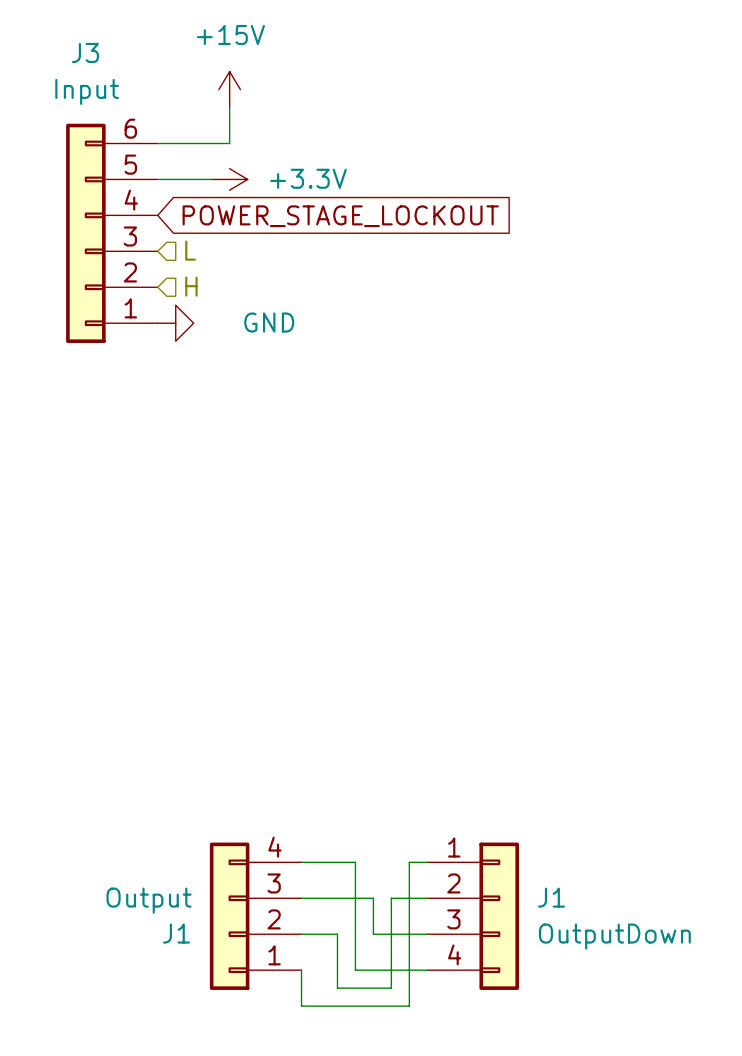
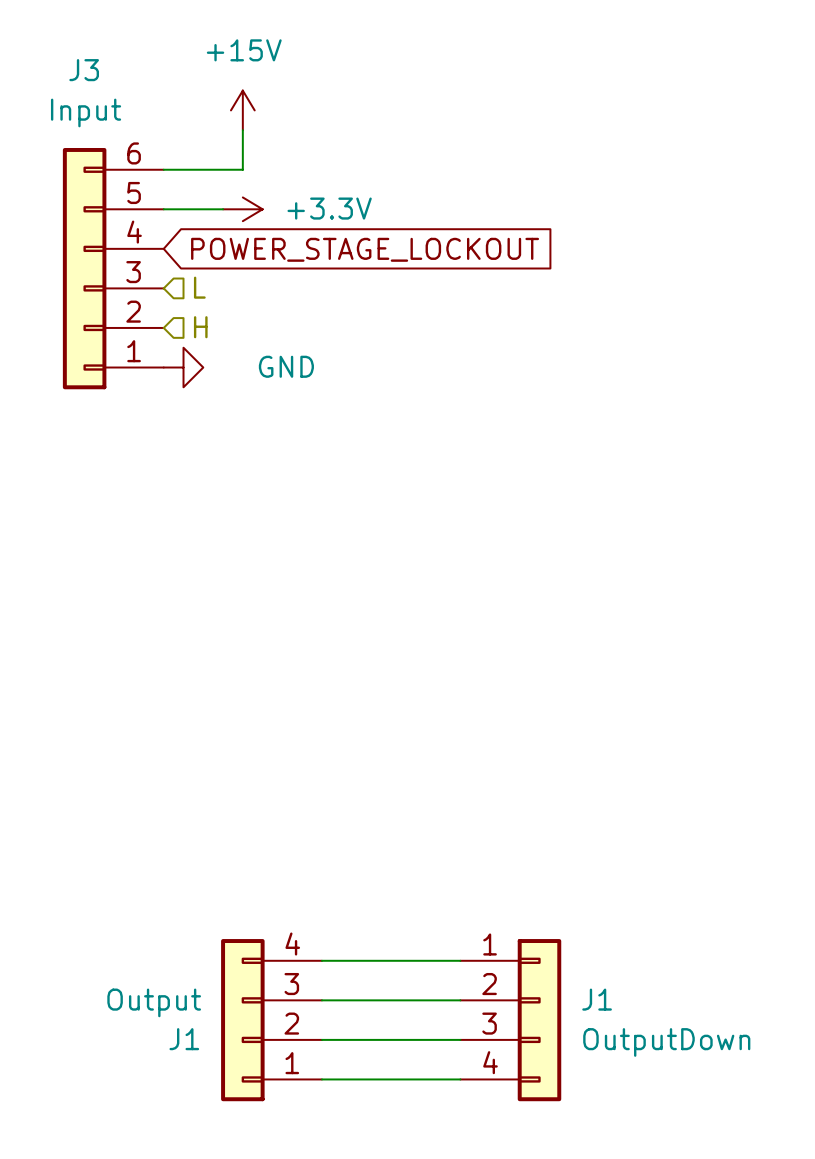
wire: (355, 862) (355, 970) -> (381, 960) (440, 960)
wire: (409, 862) (409, 1006) (301, 1006) (301, 970) -> (381, 1079) (321, 1079)
wire: (373, 898) (373, 934) -> (401, 1000) (420, 1000)
wire: (391, 898) (391, 988) (337, 988) (337, 934) -> (401, 1039) (361, 1039)

